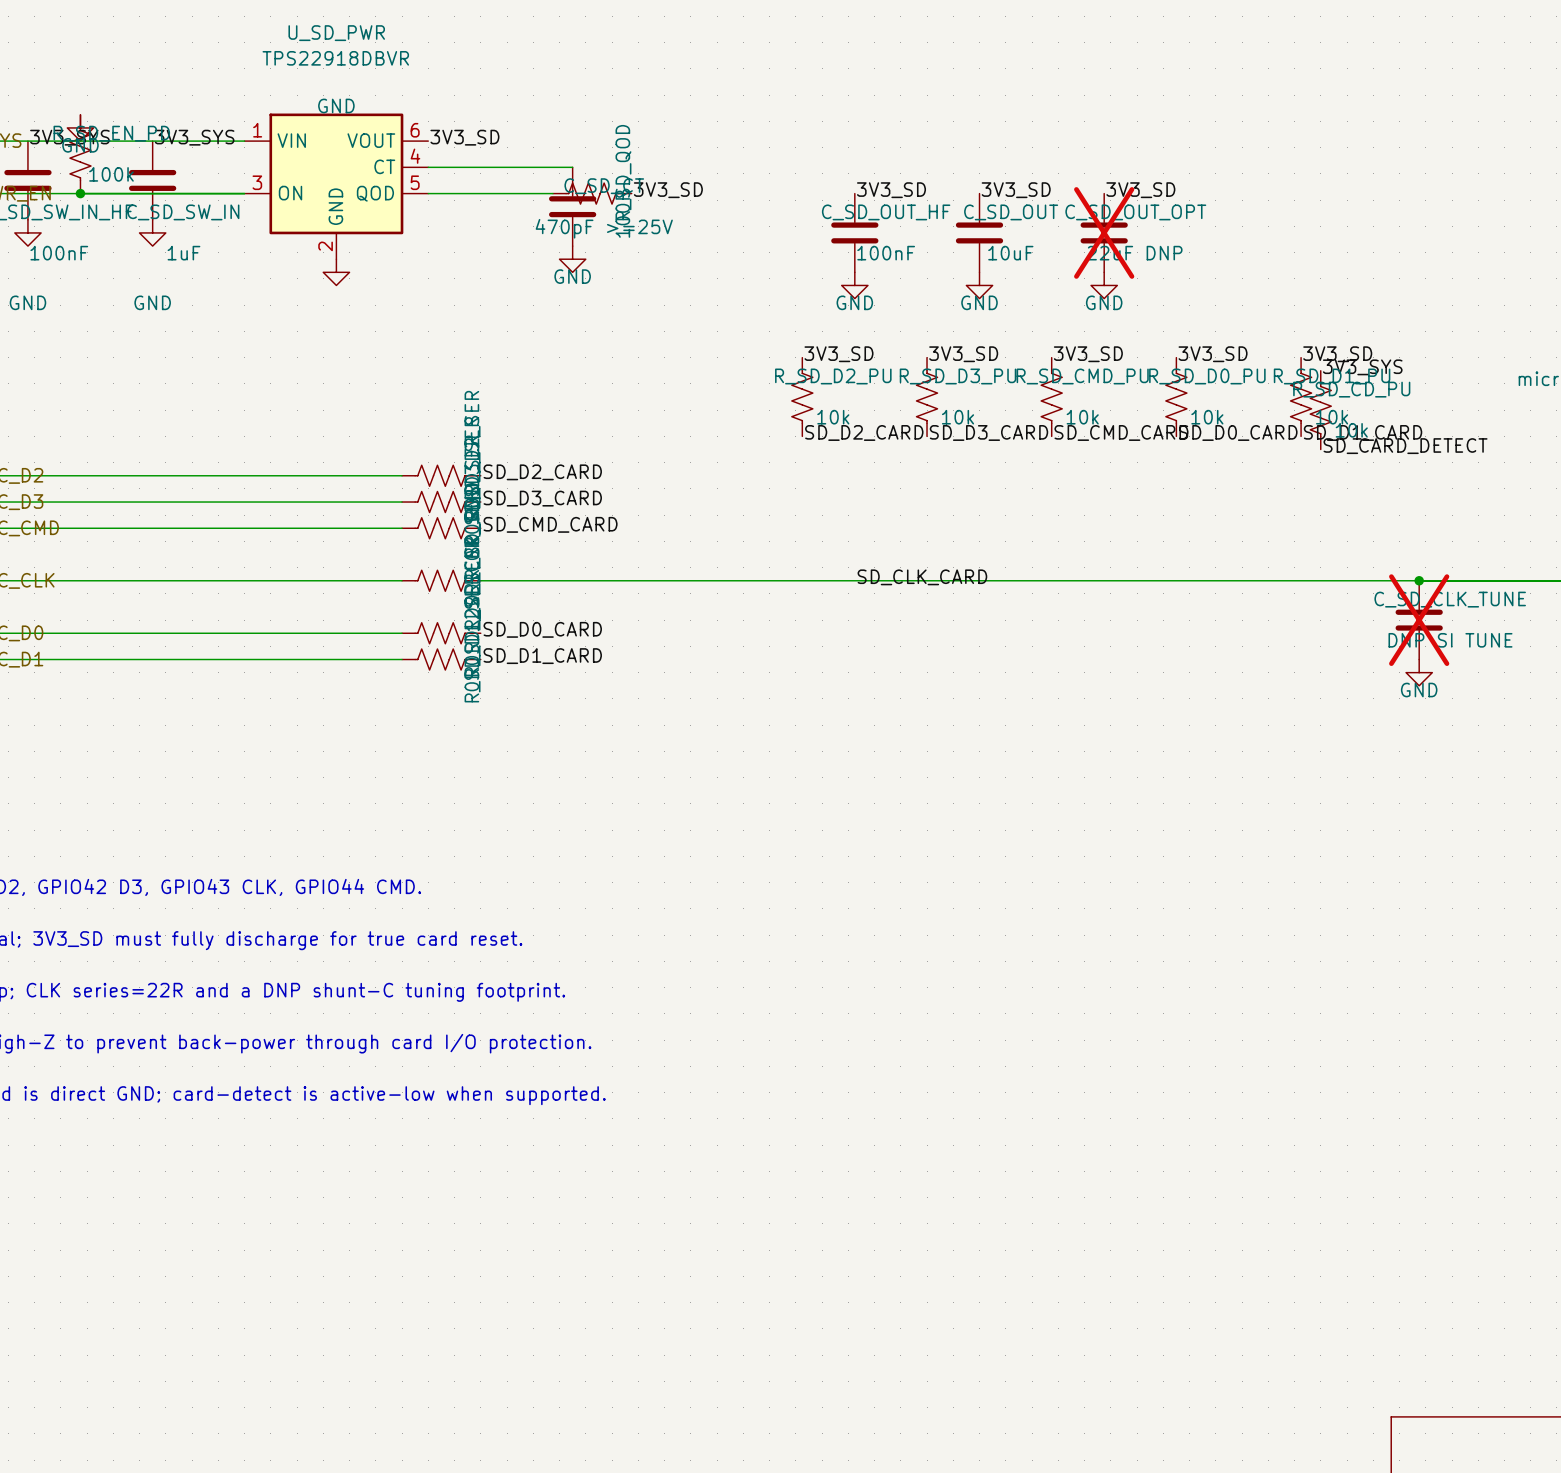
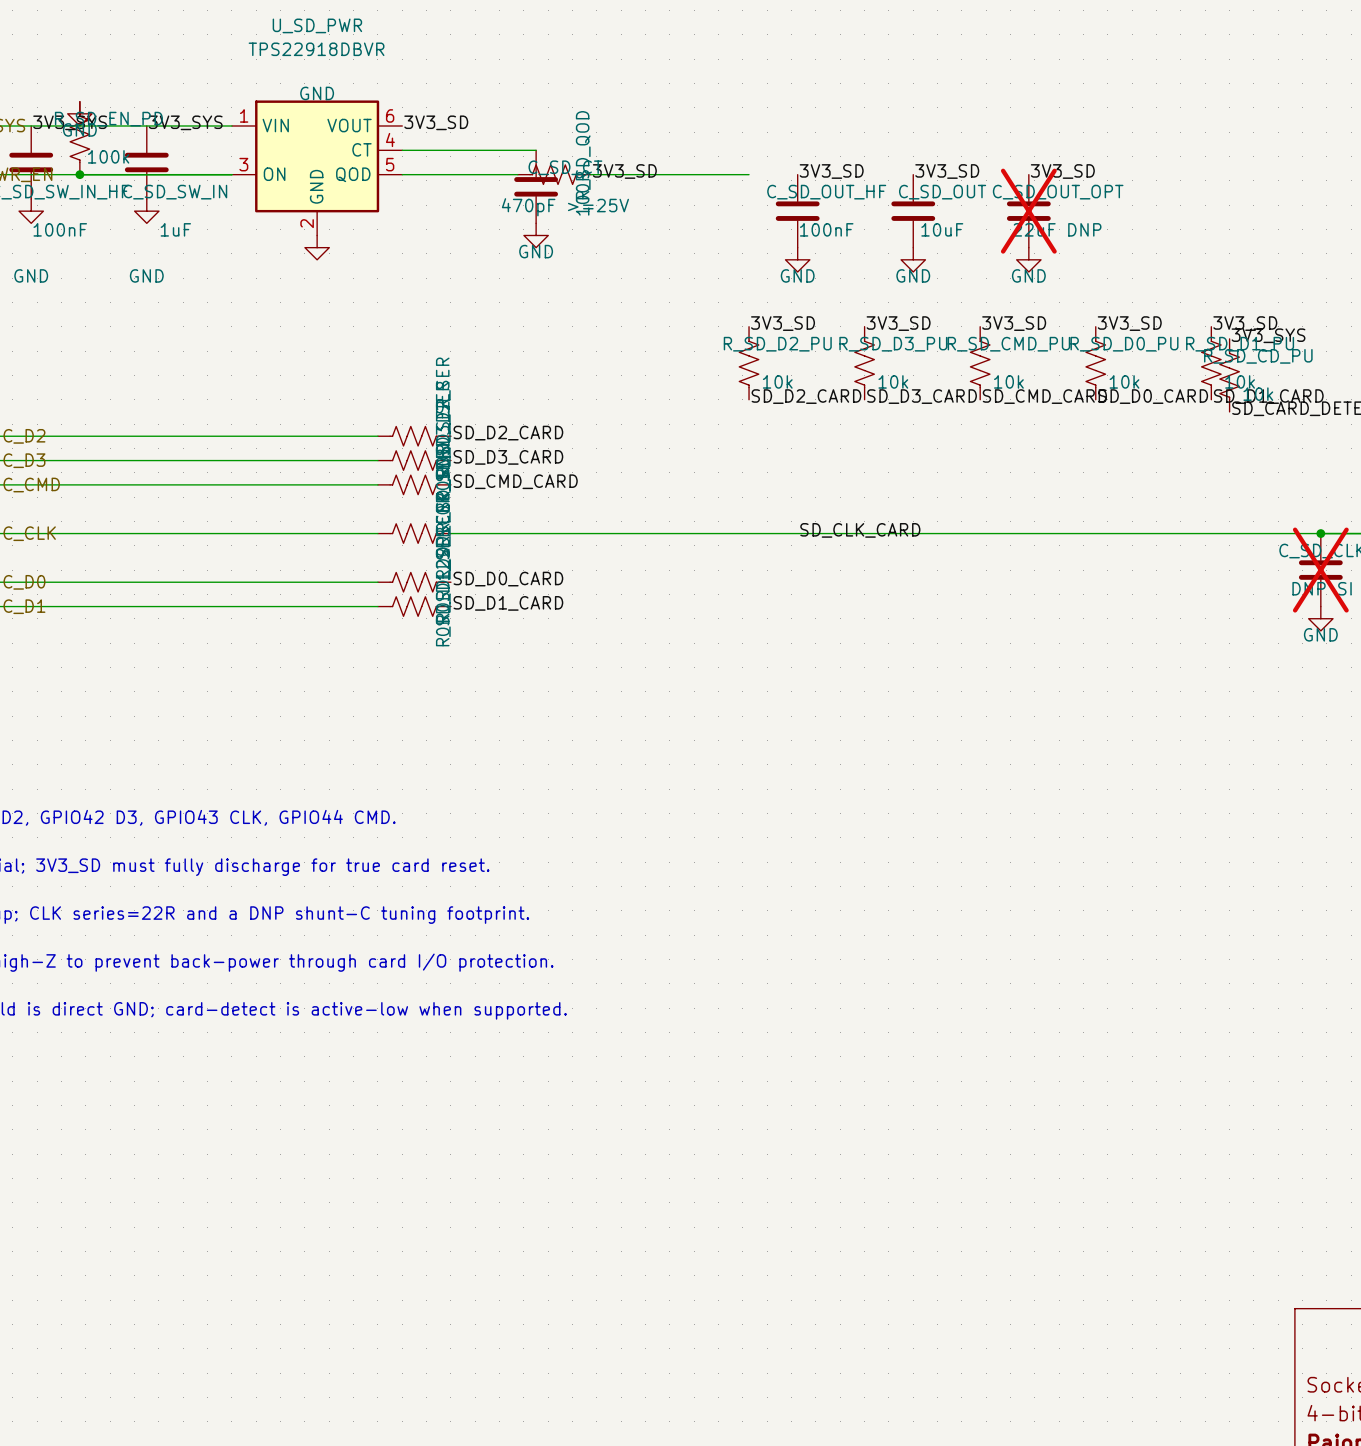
wire: none -> (590, 174) (749, 174)

